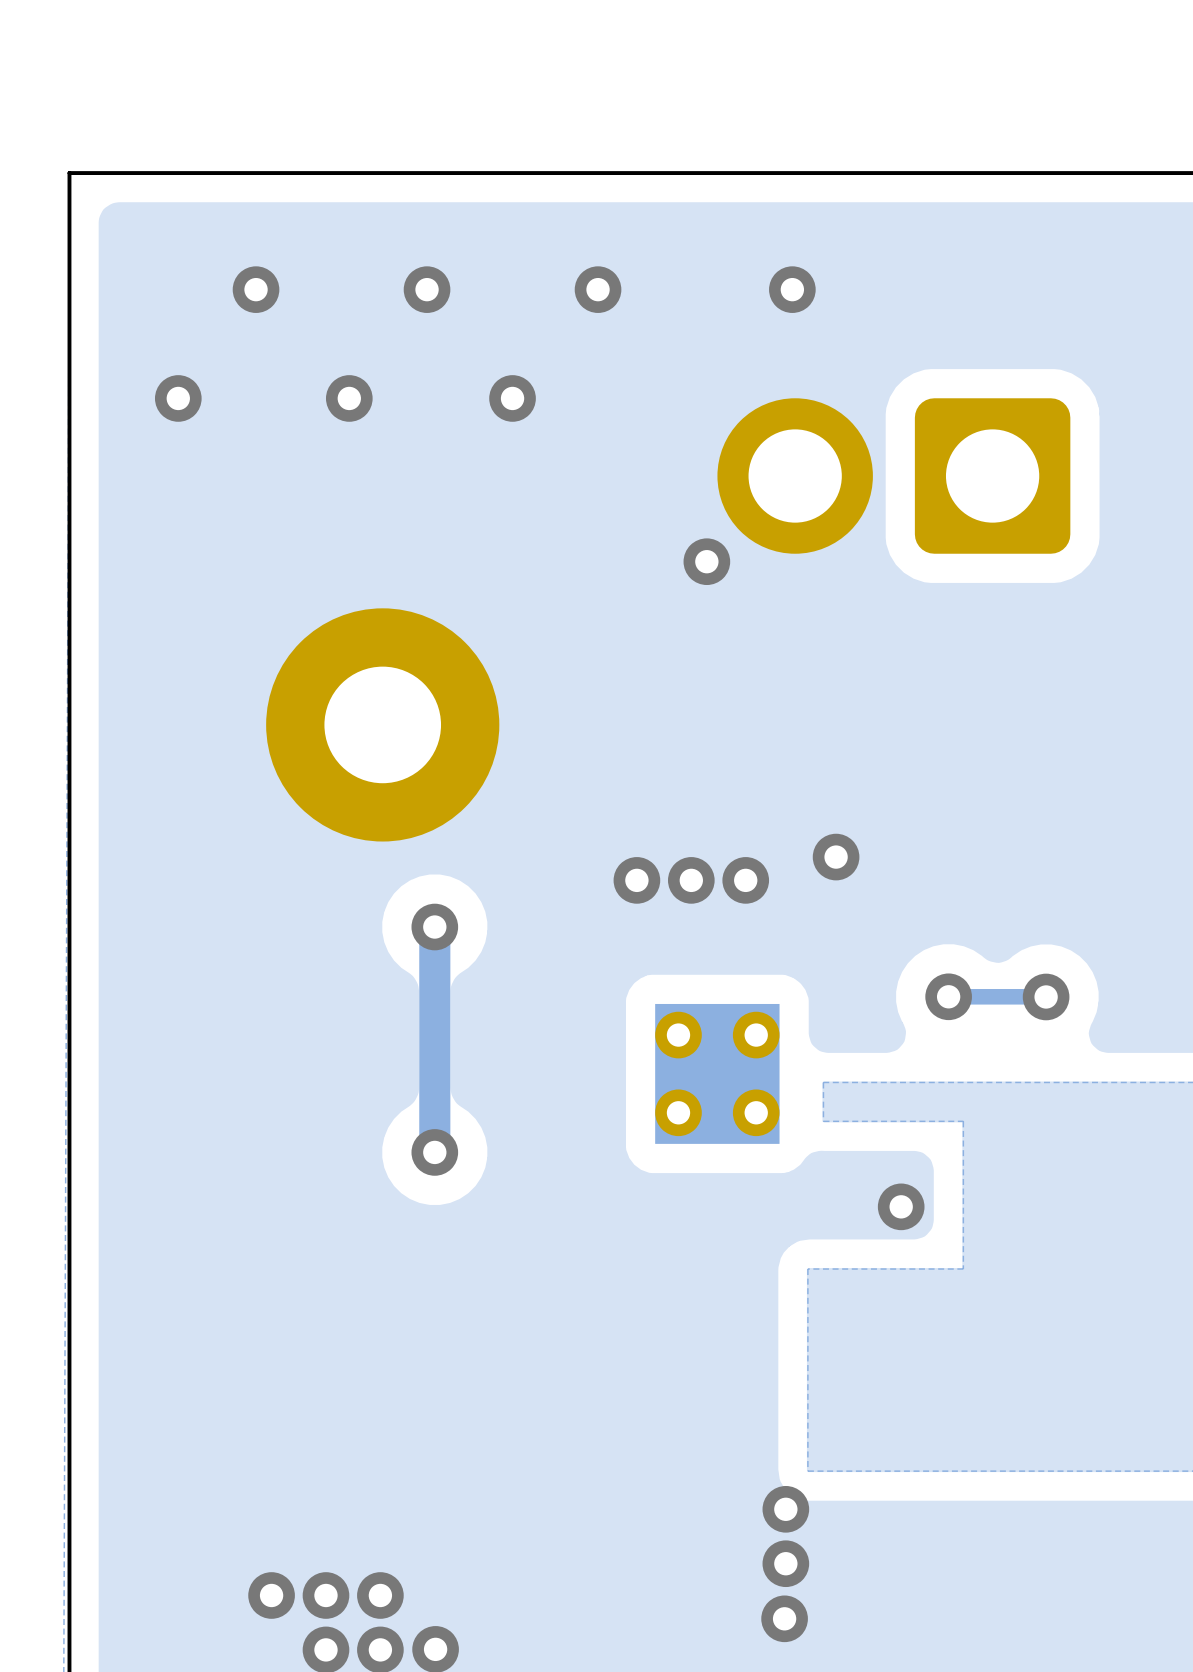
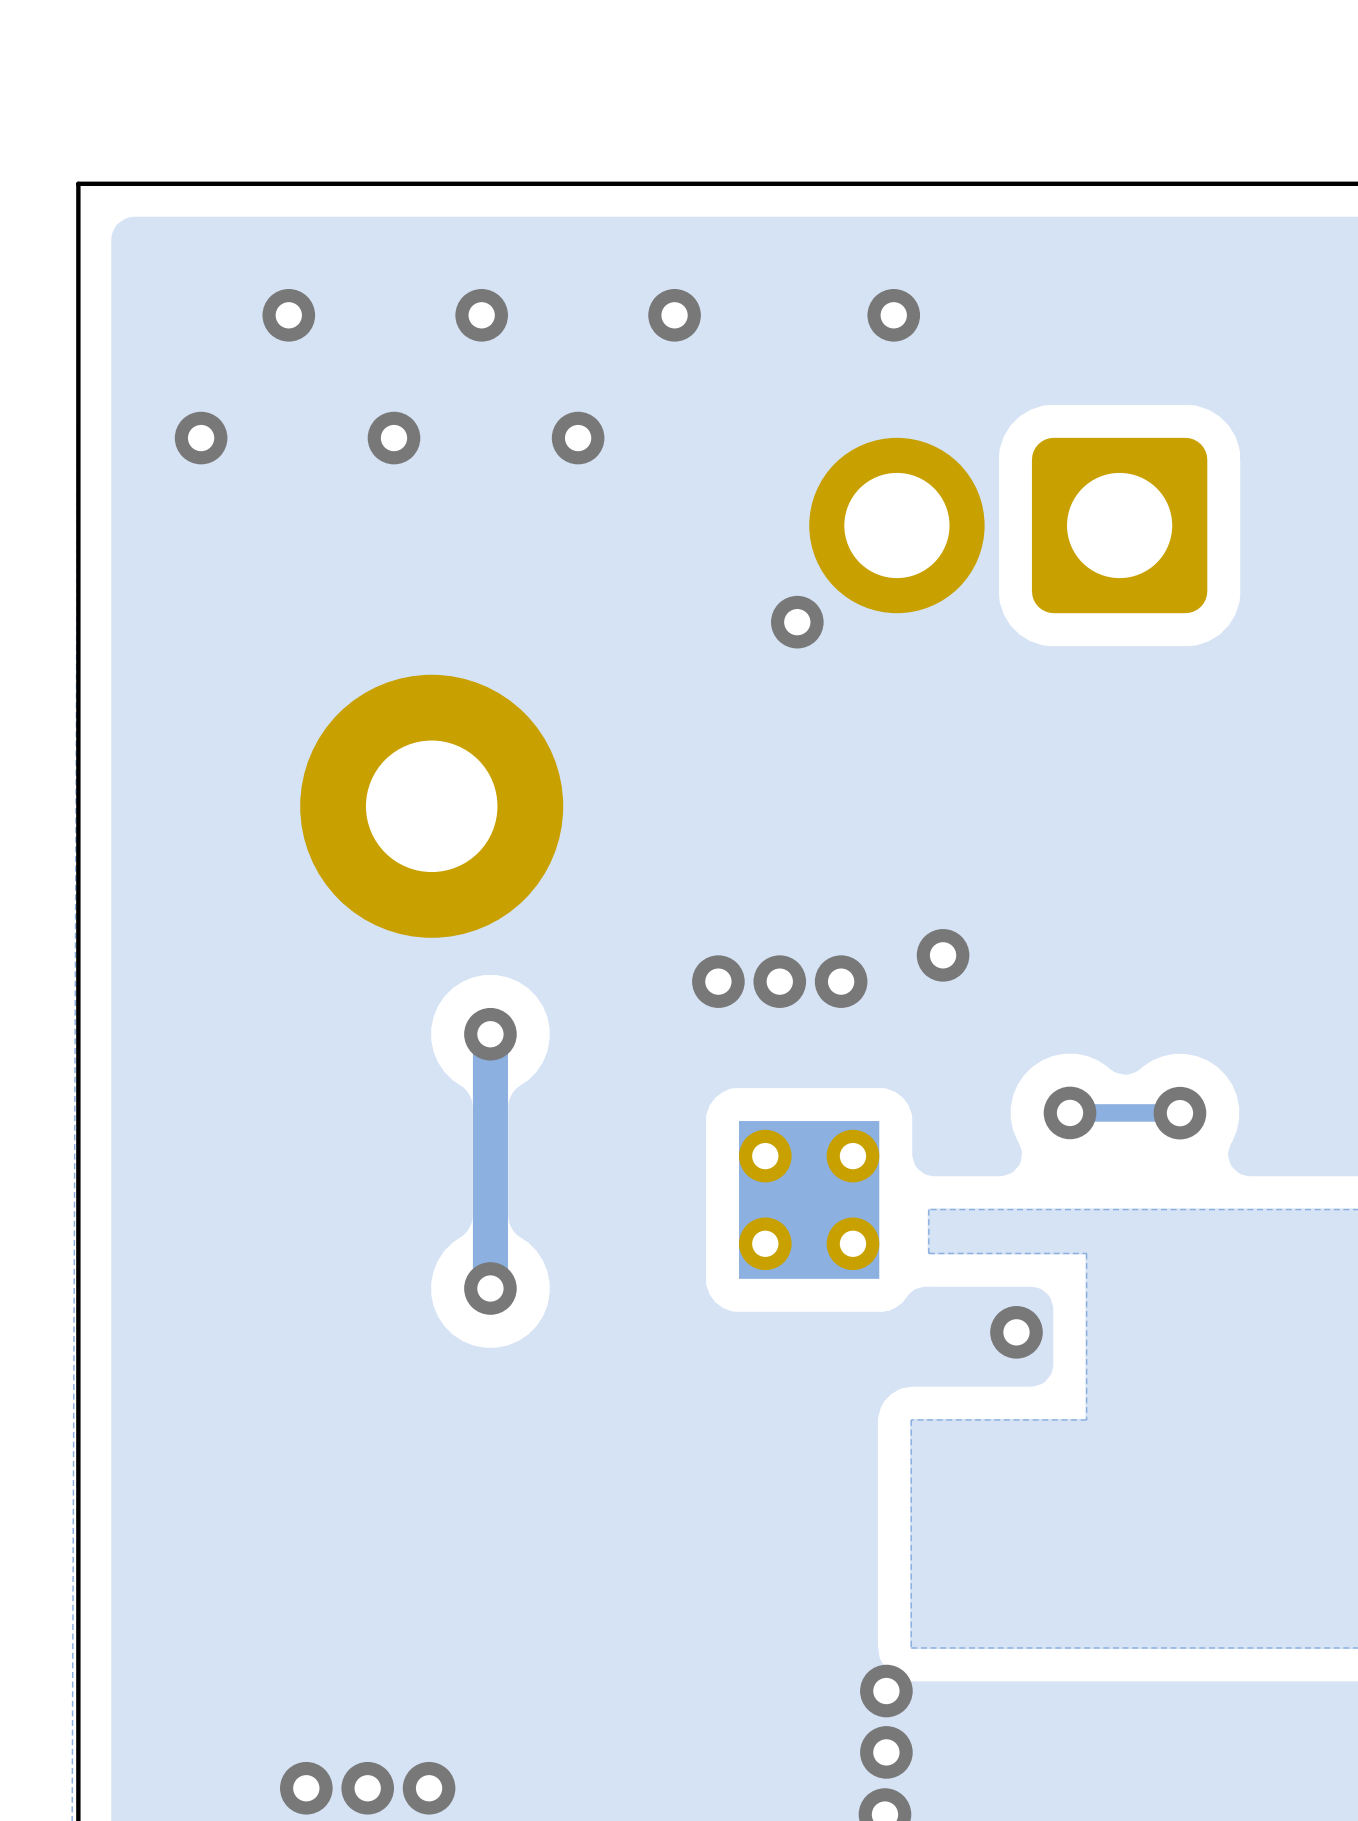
via position: (901, 1206) -> (1016, 1332)

